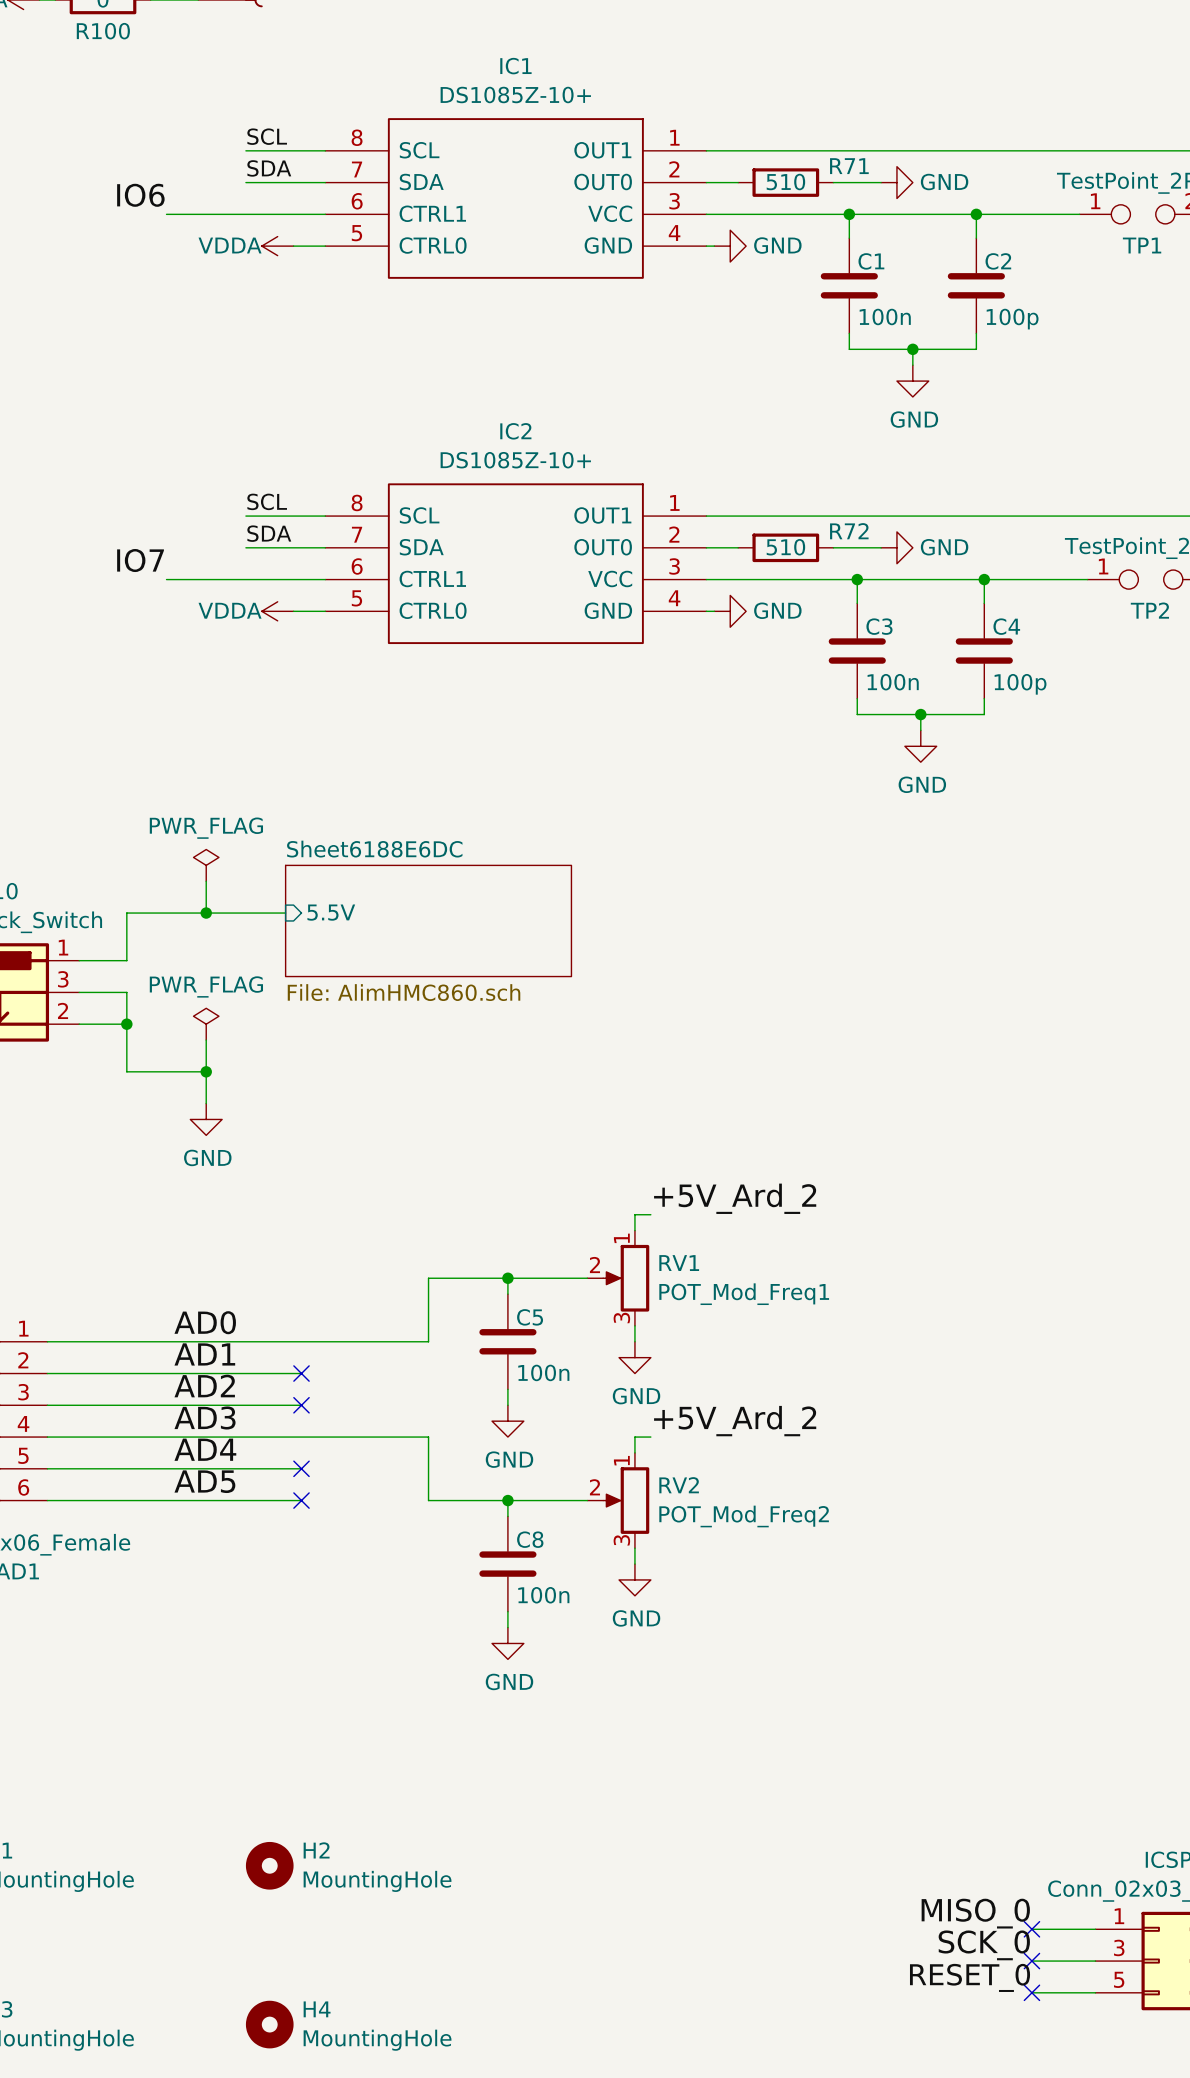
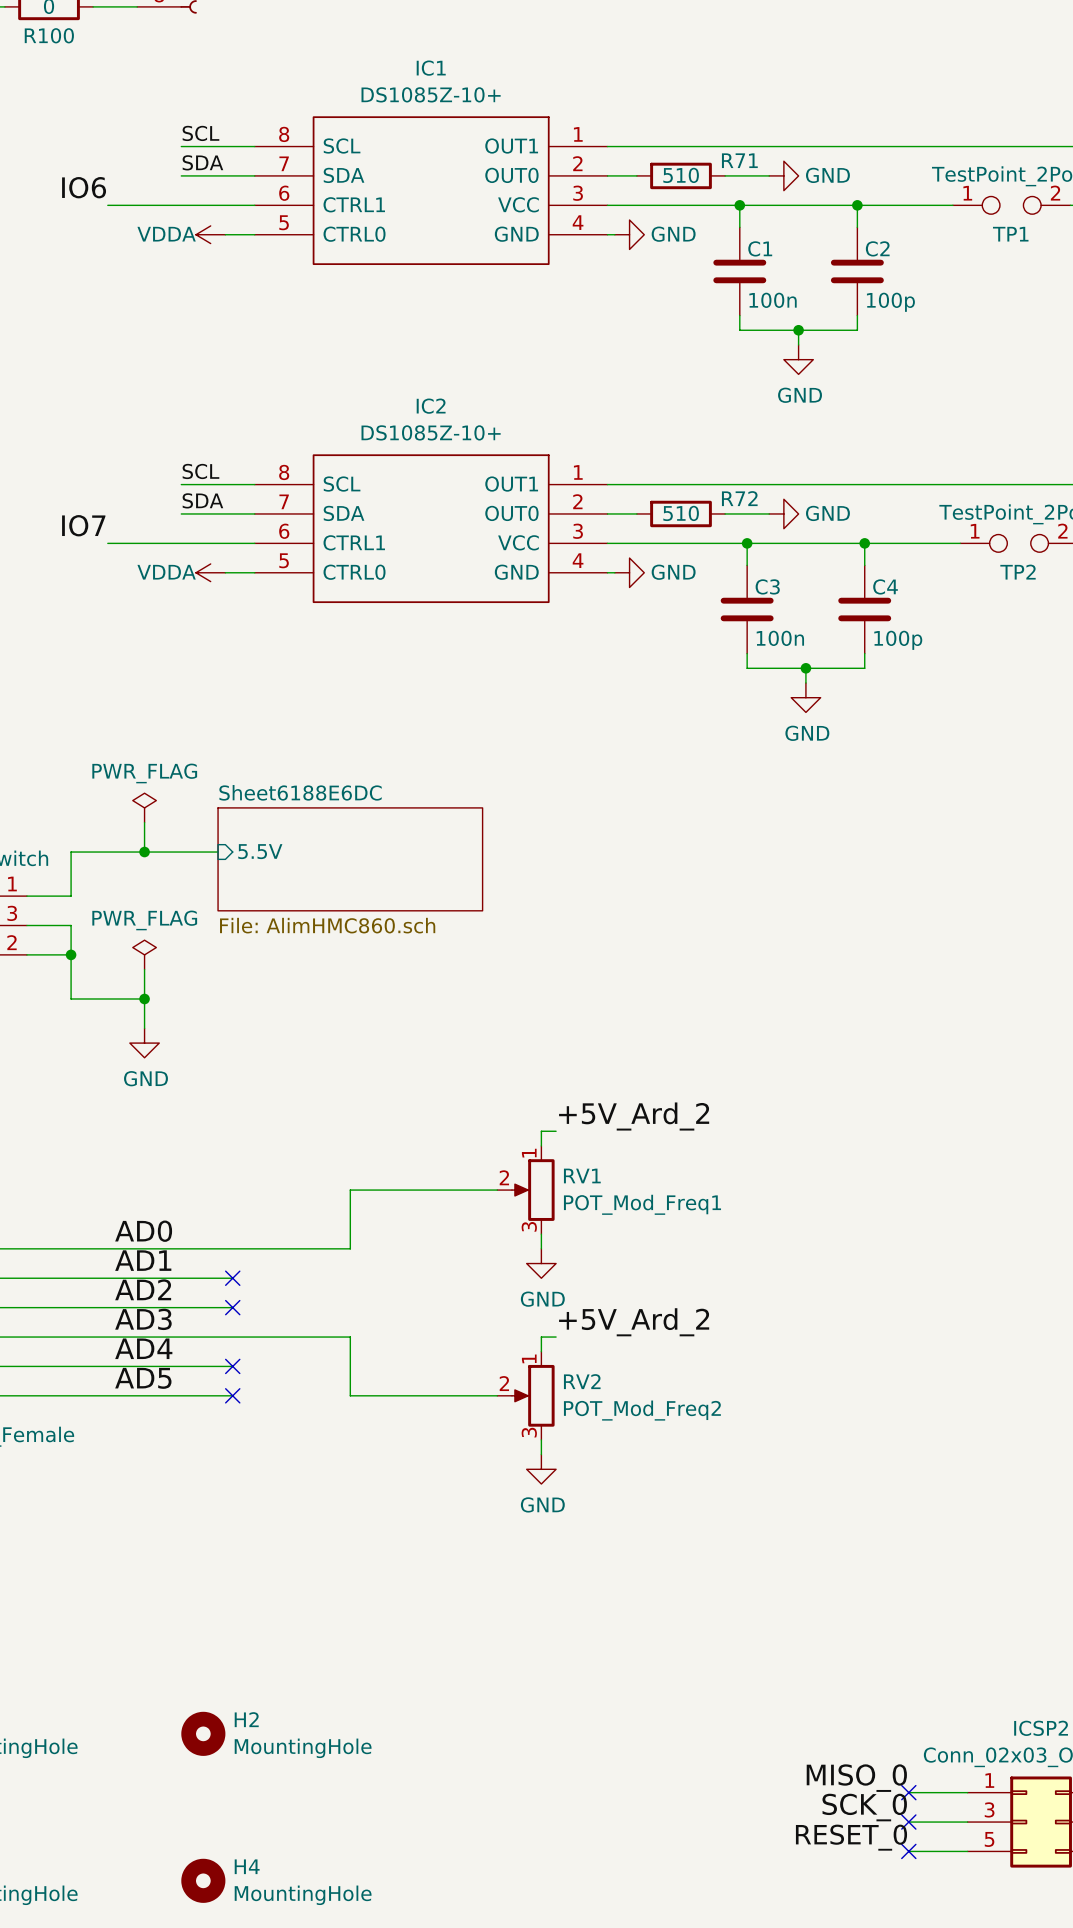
wire: (507, 1278) (507, 1294) -> none
junction: (507, 1278) -> none
C5: 100n (507, 1341) -> none
wire: (507, 1389) (507, 1405) -> none
power symbol: GND (507, 1421) -> none
wire: (507, 1500) (507, 1516) -> none
junction: (507, 1500) -> none
C8: 100n (507, 1564) -> none
wire: (507, 1611) (507, 1627) -> none
power symbol: GND (507, 1643) -> none

